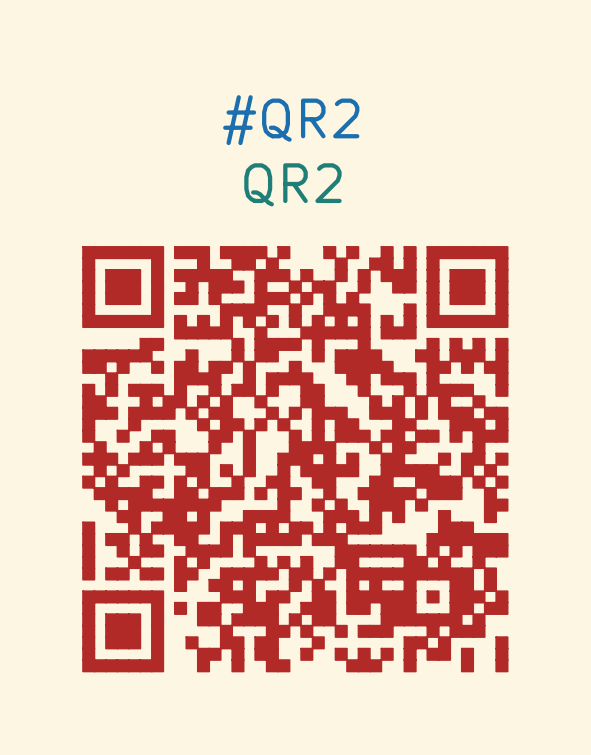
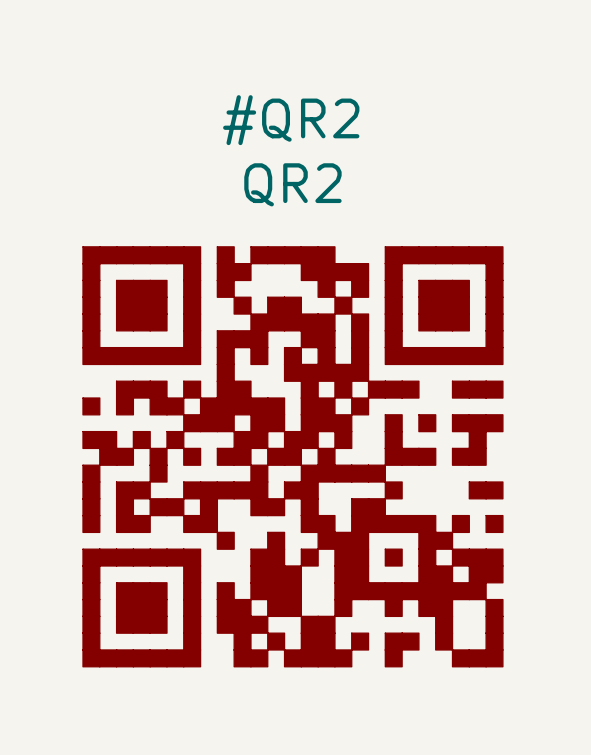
#QR2 shape: [82, 246, 508, 672] -> [82, 246, 503, 667]

